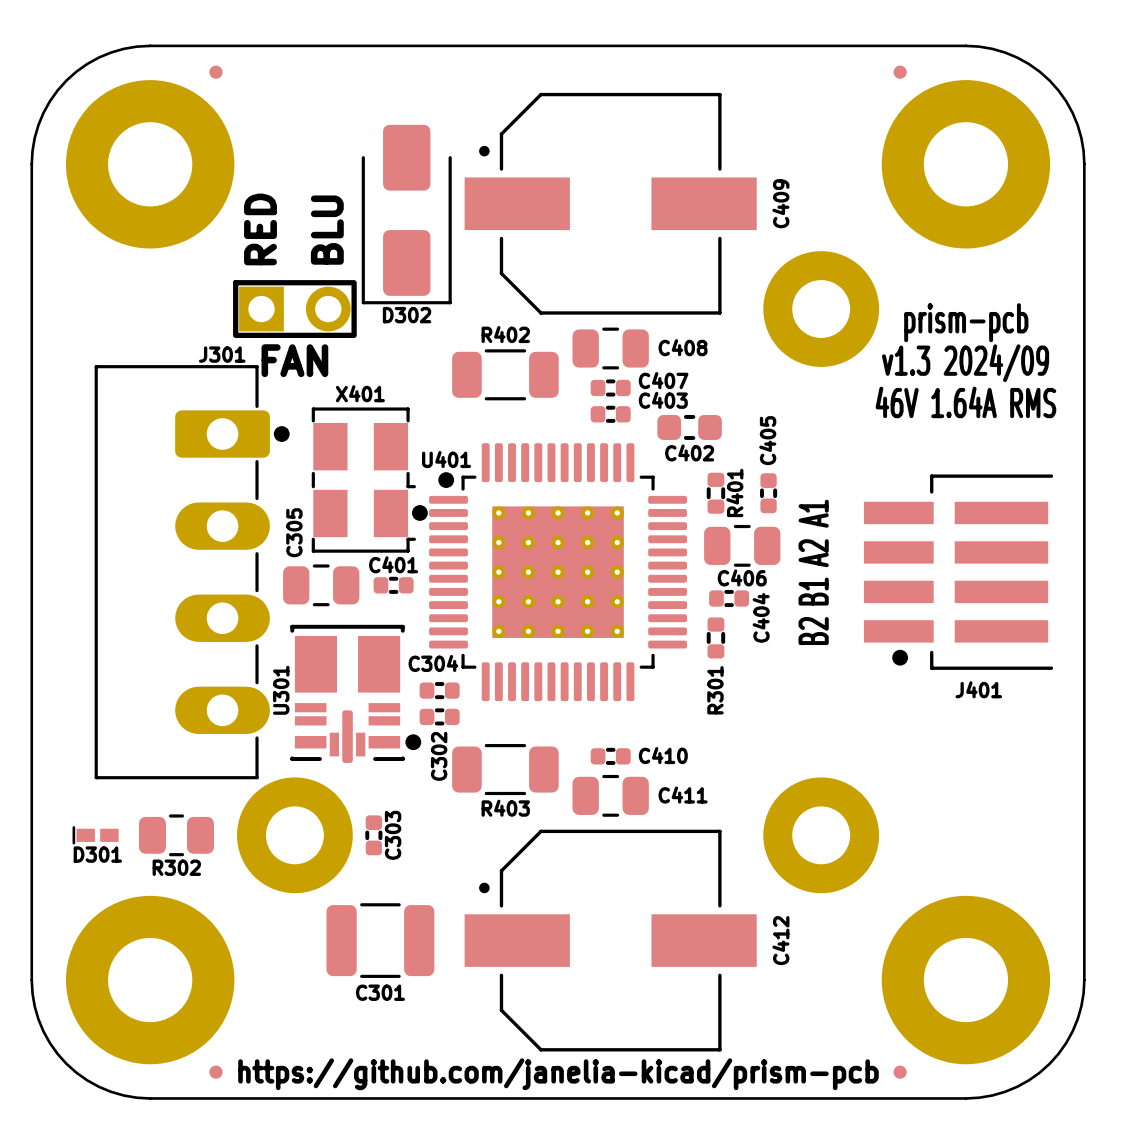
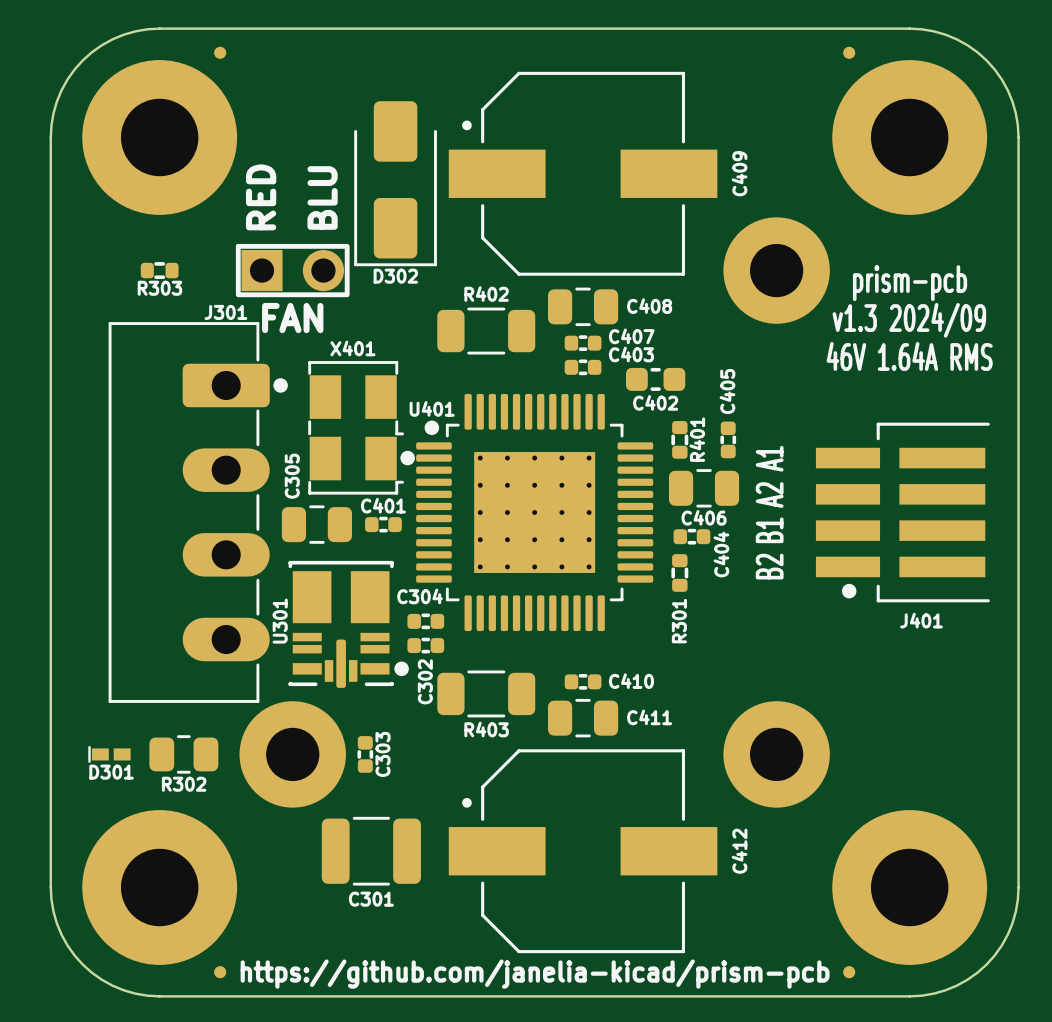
R303: none -> (159, 270)

